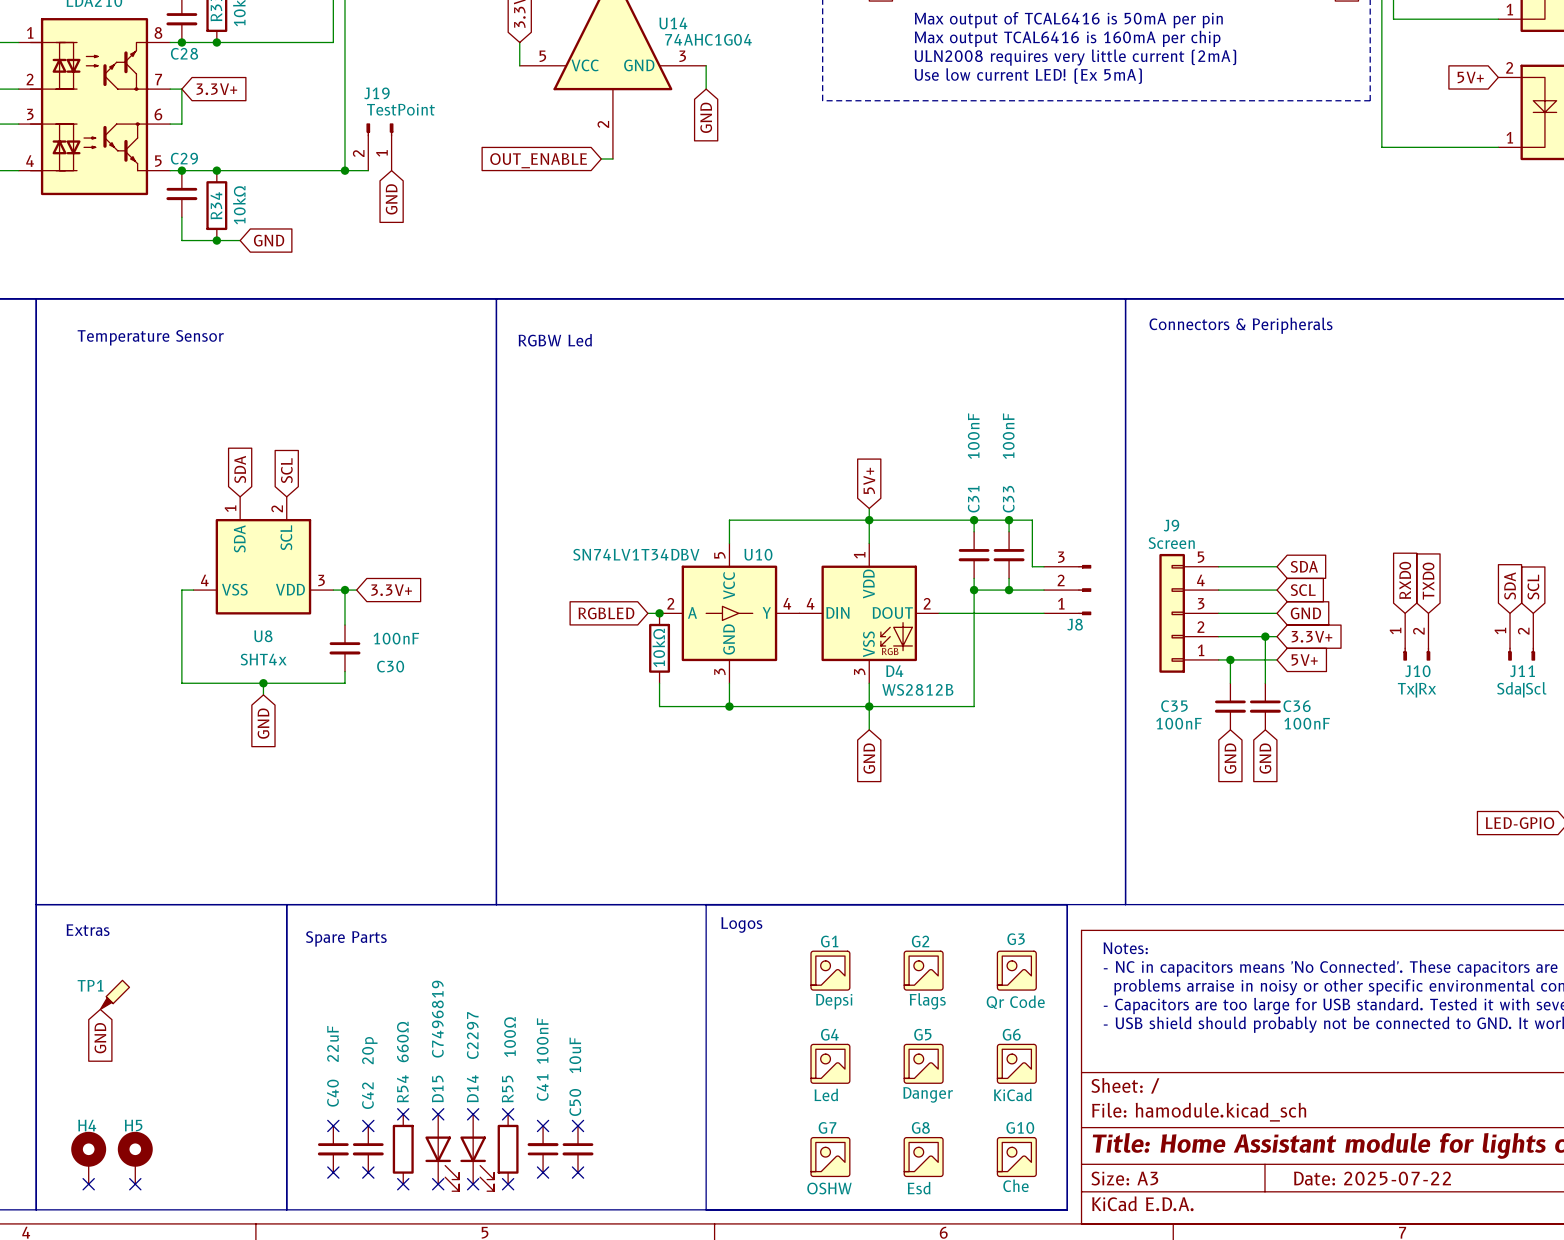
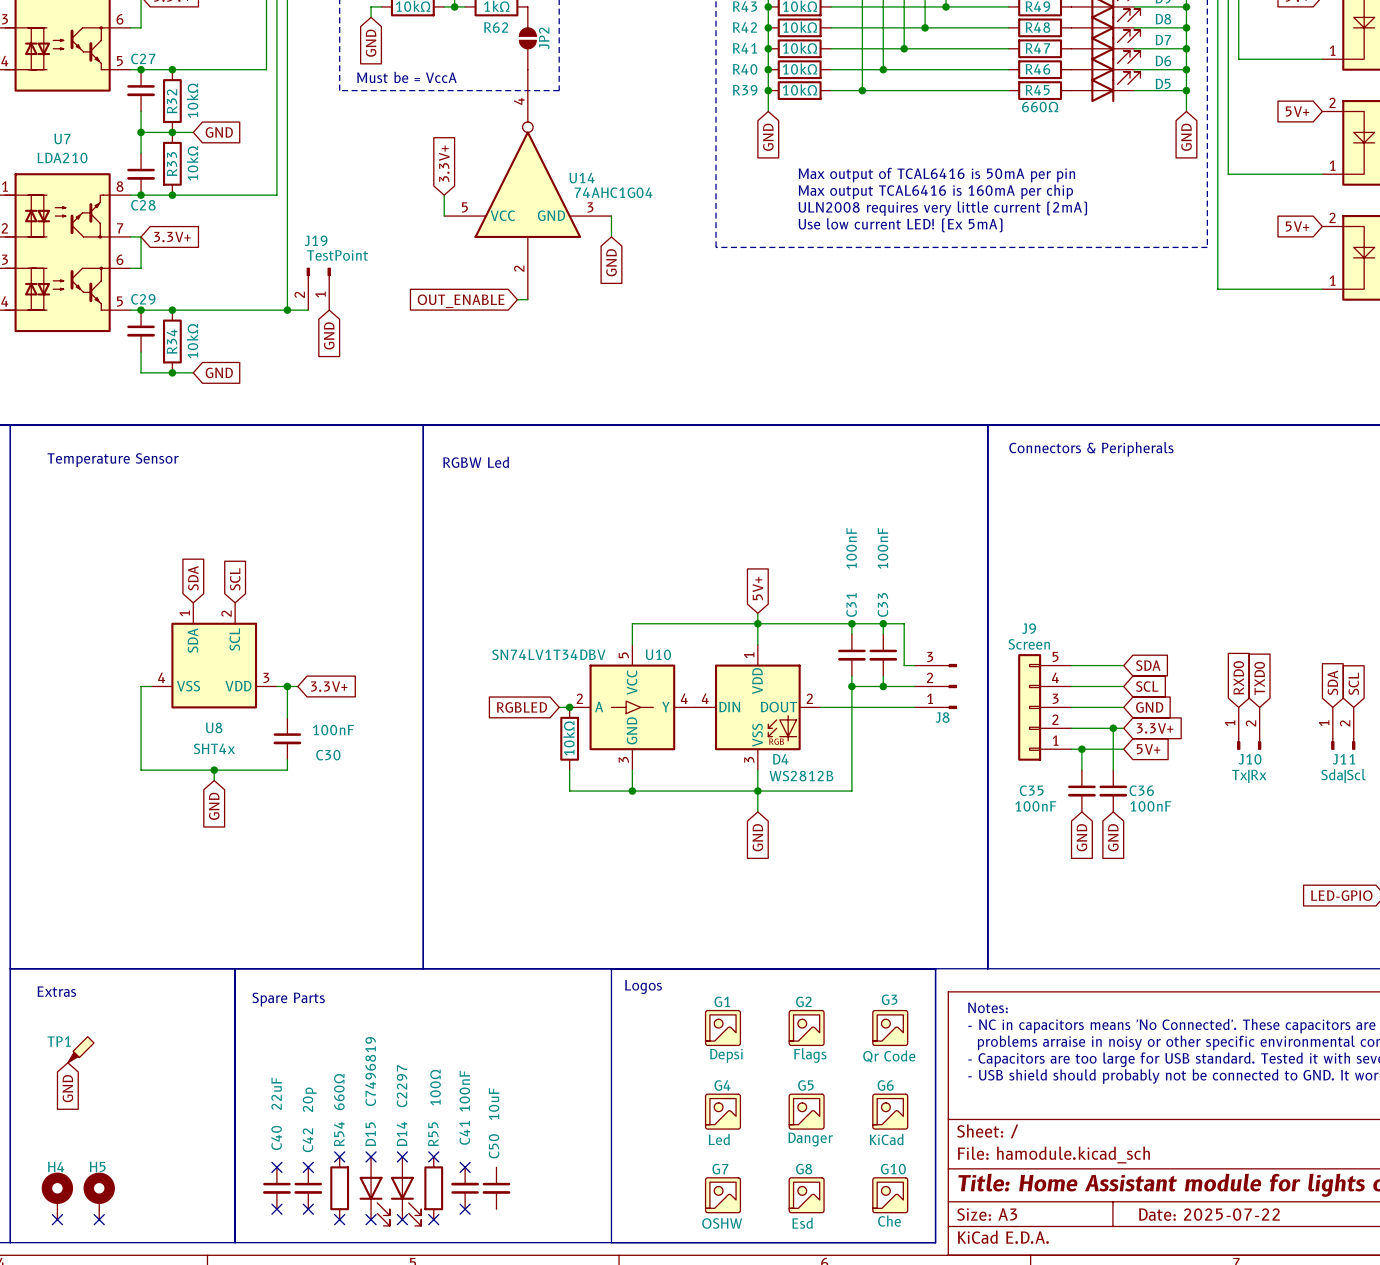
no-connect mark: (577, 1125) -> none
no-connect mark: (577, 1172) -> none

